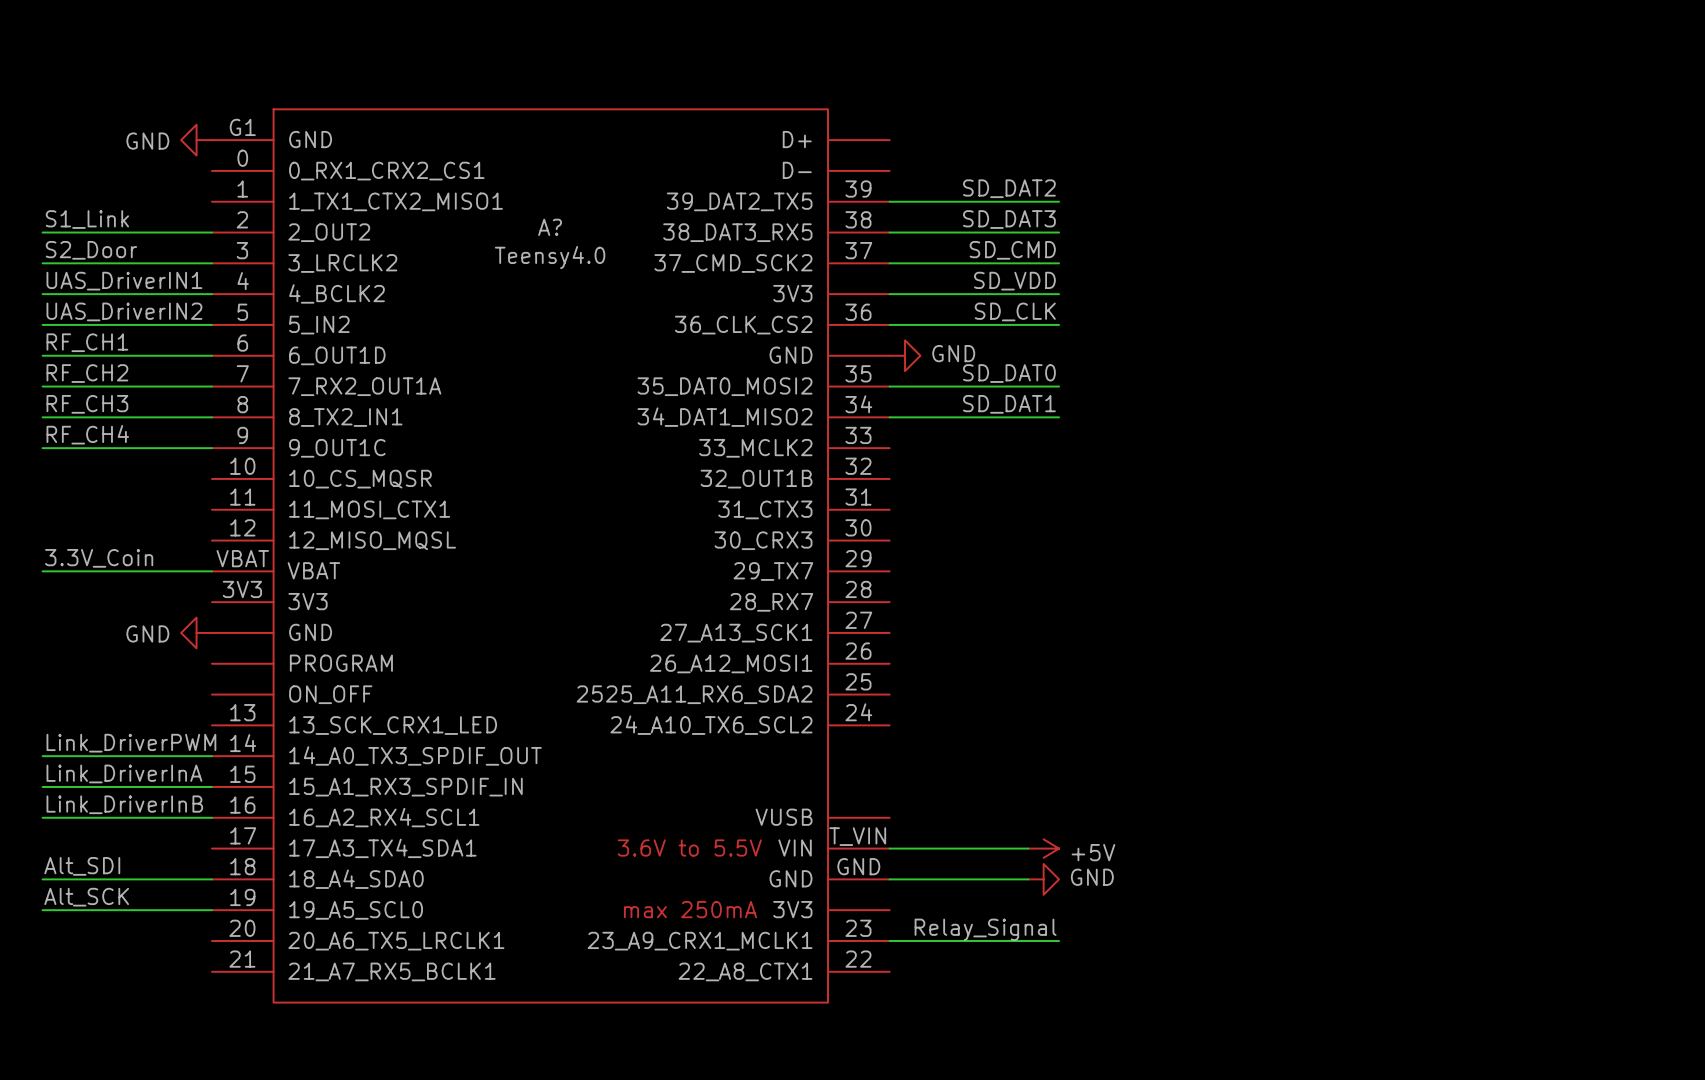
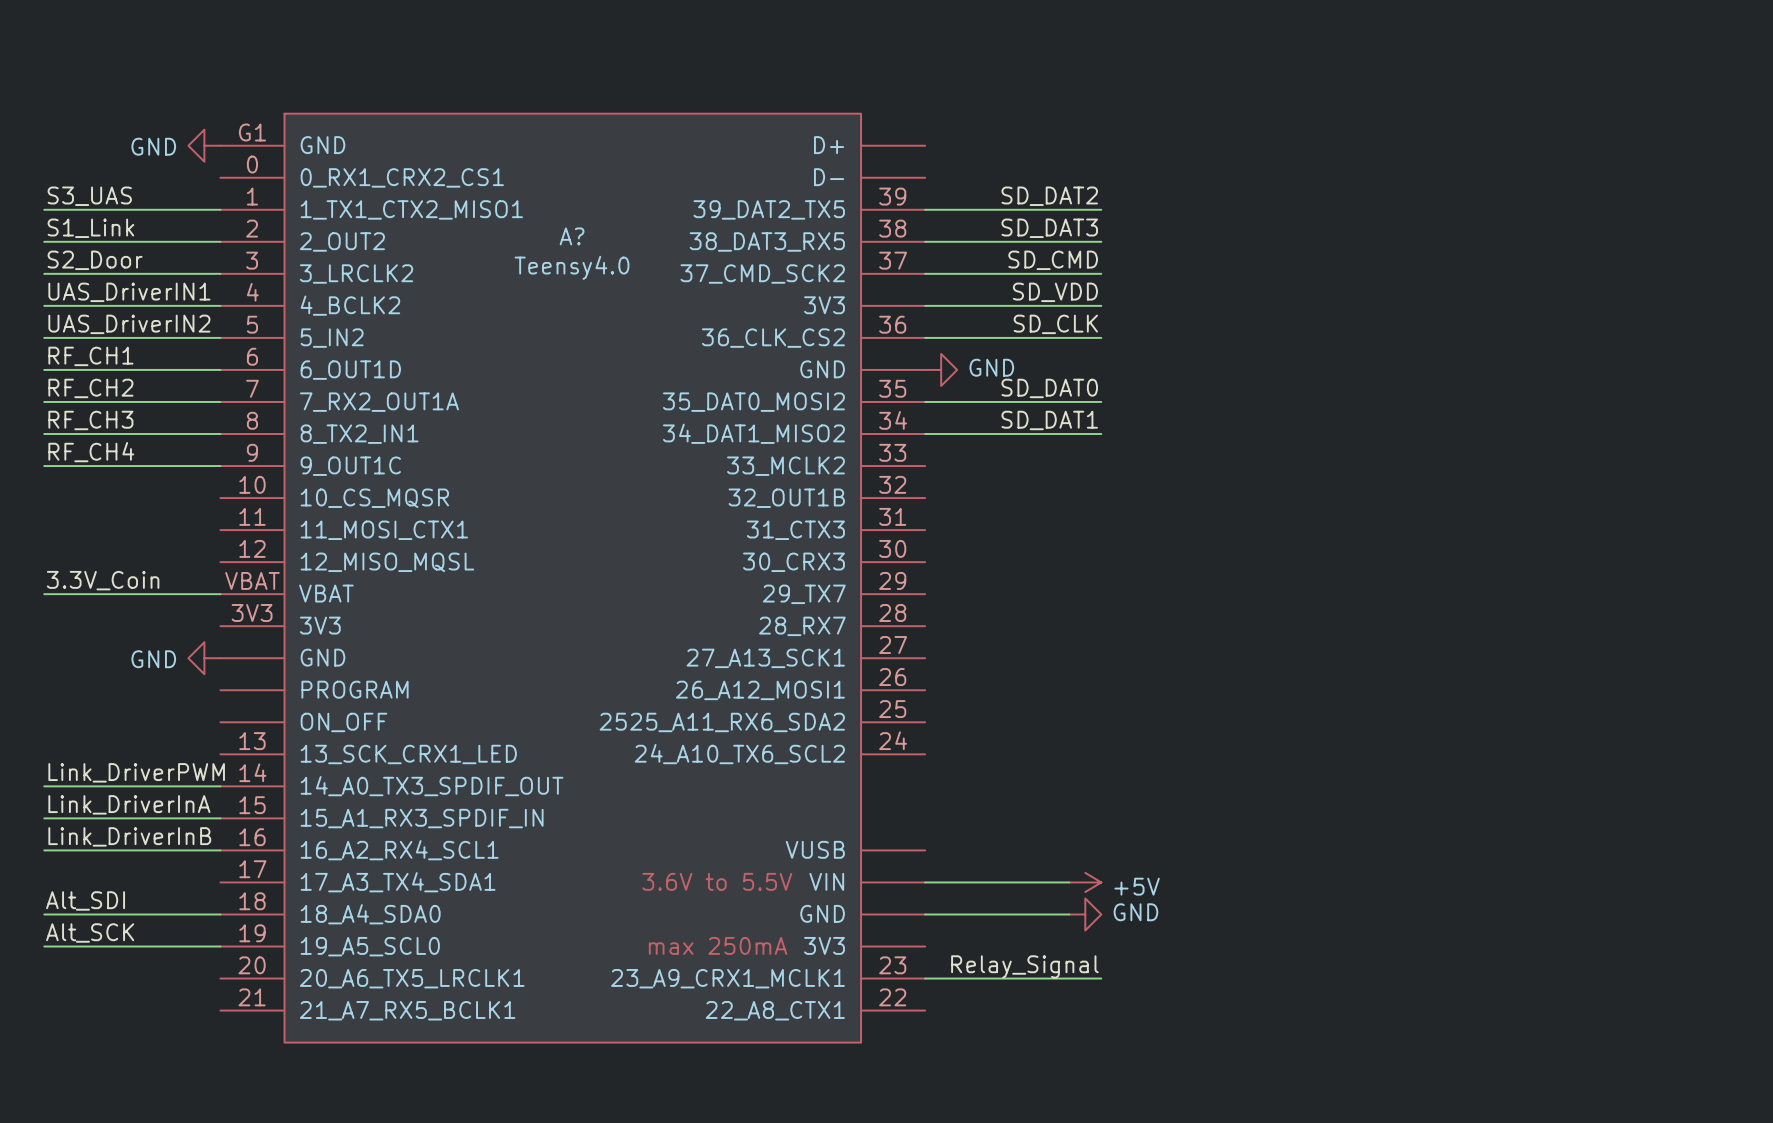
label: none -> S3_UAS (89, 196)
wire: none -> (44, 209) (220, 209)
A? pin number: T_VIN (857, 836) -> none
A? pin number: GND (858, 866) -> none

